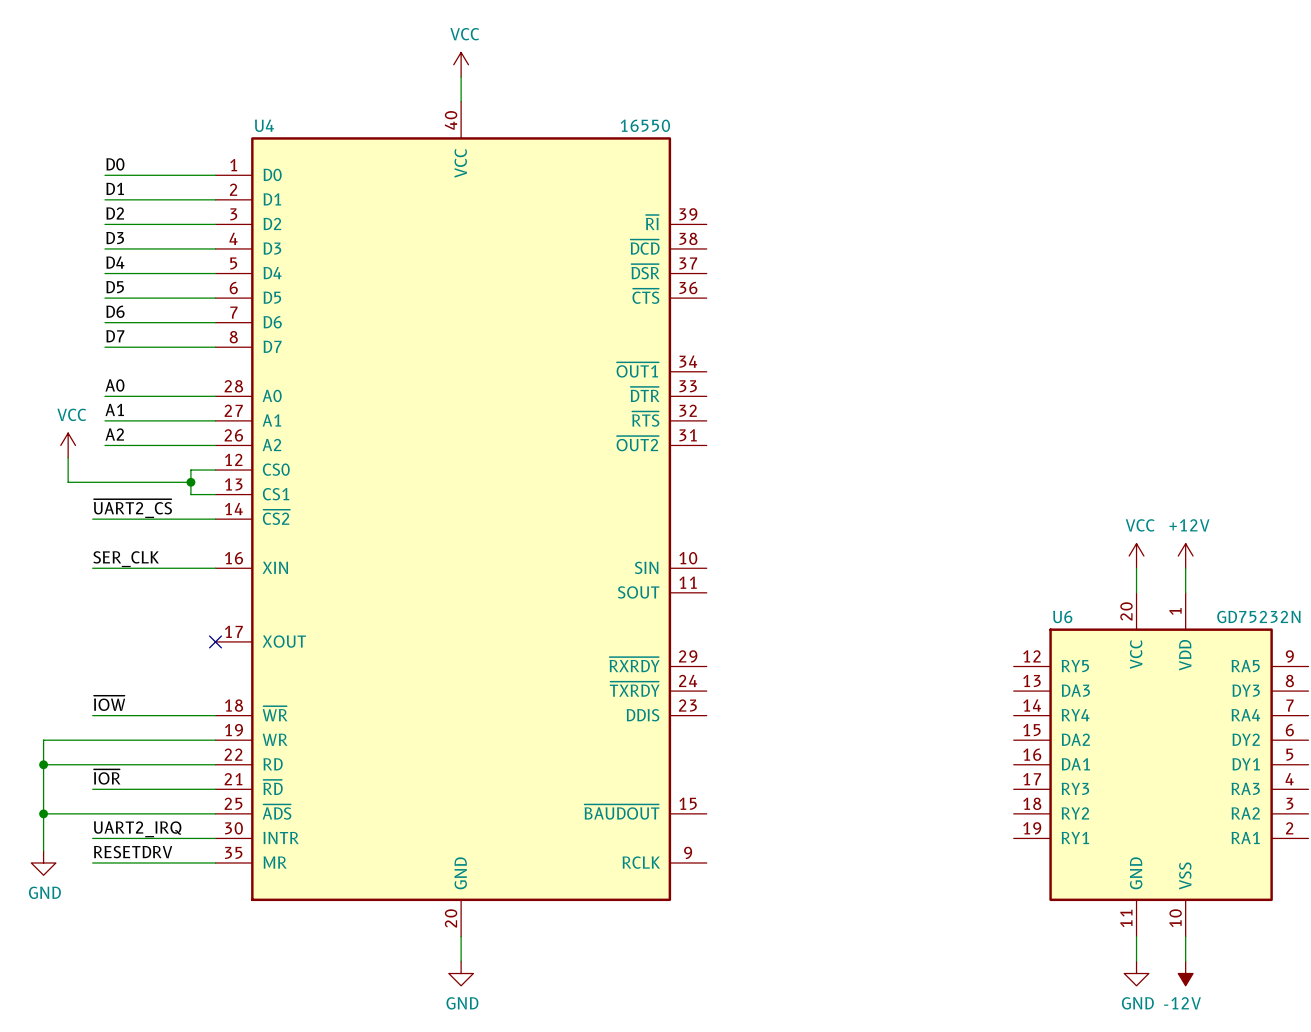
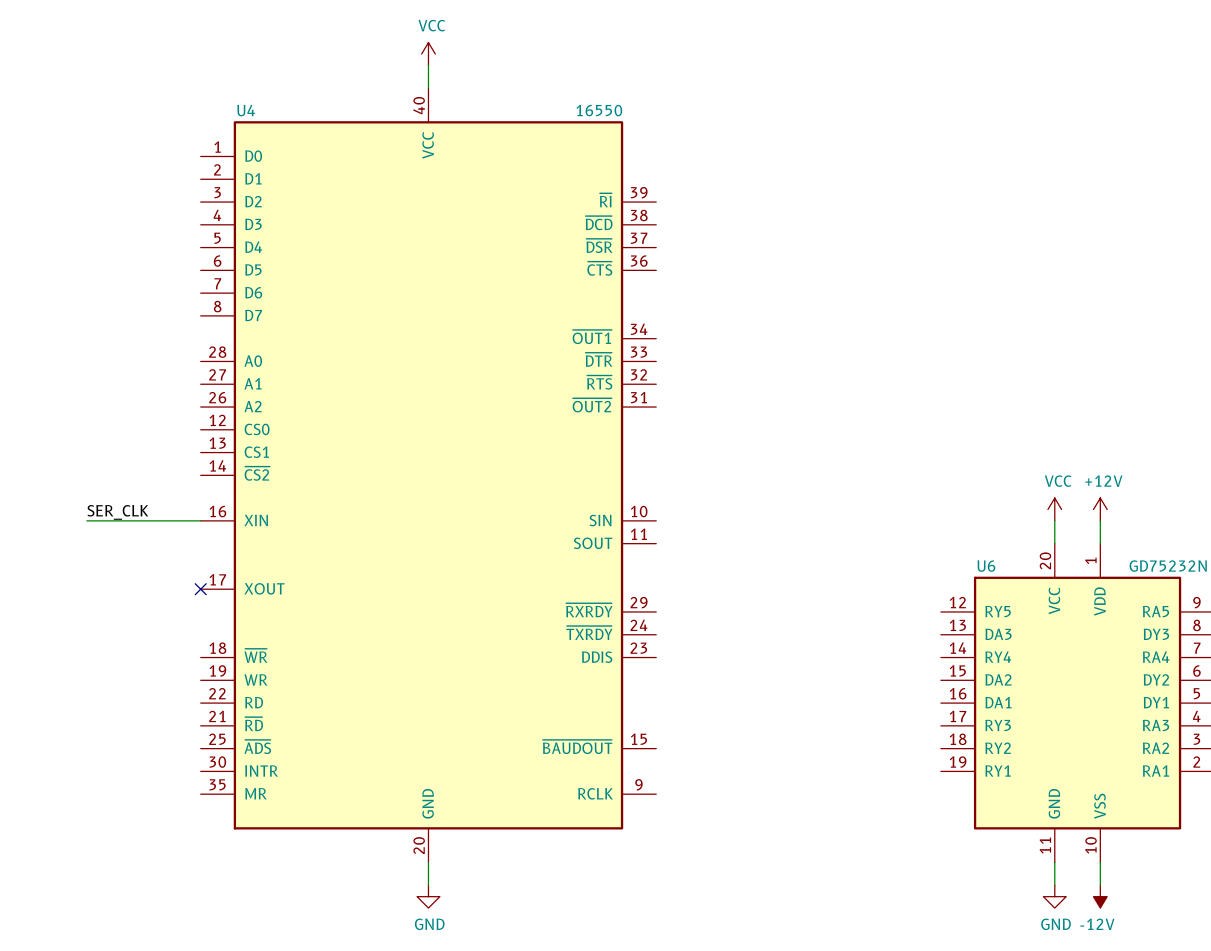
label: D0 (115, 164) -> none
wire: (104, 175) (215, 175) -> none
label: D1 (115, 188) -> none
wire: (104, 199) (215, 199) -> none
label: D2 (115, 213) -> none
wire: (104, 224) (215, 224) -> none
label: D3 (115, 238) -> none
wire: (104, 248) (215, 248) -> none
label: D4 (115, 262) -> none
wire: (104, 273) (215, 273) -> none
label: D5 (115, 287) -> none
wire: (104, 298) (215, 298) -> none
label: D6 (115, 311) -> none
wire: (104, 322) (215, 322) -> none
label: D7 (115, 336) -> none
wire: (104, 347) (215, 347) -> none
label: A0 (114, 385) -> none
wire: (104, 396) (215, 396) -> none
label: A1 (114, 409) -> none
wire: (104, 420) (215, 420) -> none
label: A2 (114, 434) -> none
power symbol: VCC (68, 445) -> none
wire: (104, 445) (215, 445) -> none
wire: (68, 457) (68, 482) (190, 482) -> none
wire: (215, 470) (190, 470) (190, 494) (215, 494) -> none
junction: (190, 482) -> none
label: ~{UART2_CS} (132, 508) -> none
wire: (92, 519) (215, 519) -> none
label: ~{IOW} (109, 703) -> none
wire: (92, 715) (215, 715) -> none
wire: (215, 740) (43, 740) (43, 850) -> none
wire: (43, 764) (215, 764) -> none
junction: (43, 764) -> none
label: ~{IOR} (107, 777) -> none
wire: (92, 789) (215, 789) -> none
wire: (43, 813) (215, 813) -> none
junction: (43, 813) -> none
label: UART2_IRQ (137, 829) -> none
wire: (92, 838) (215, 838) -> none
label: RESETDRV (133, 852) -> none
power symbol: GND (43, 862) -> none
wire: (92, 862) (215, 862) -> none

